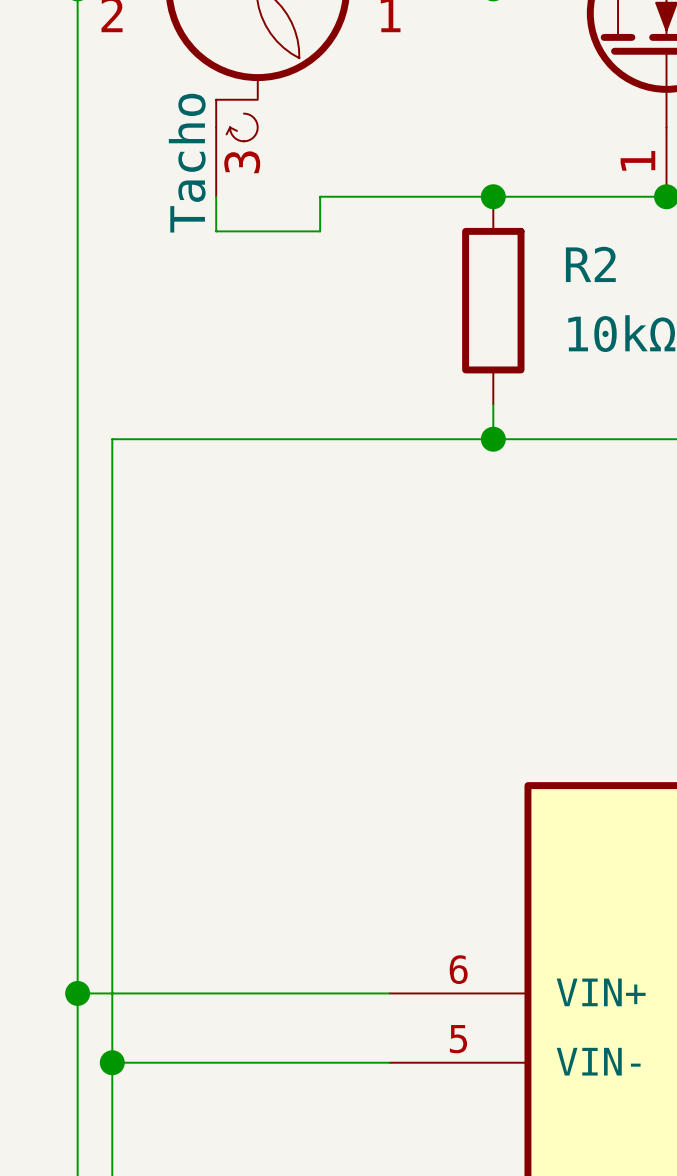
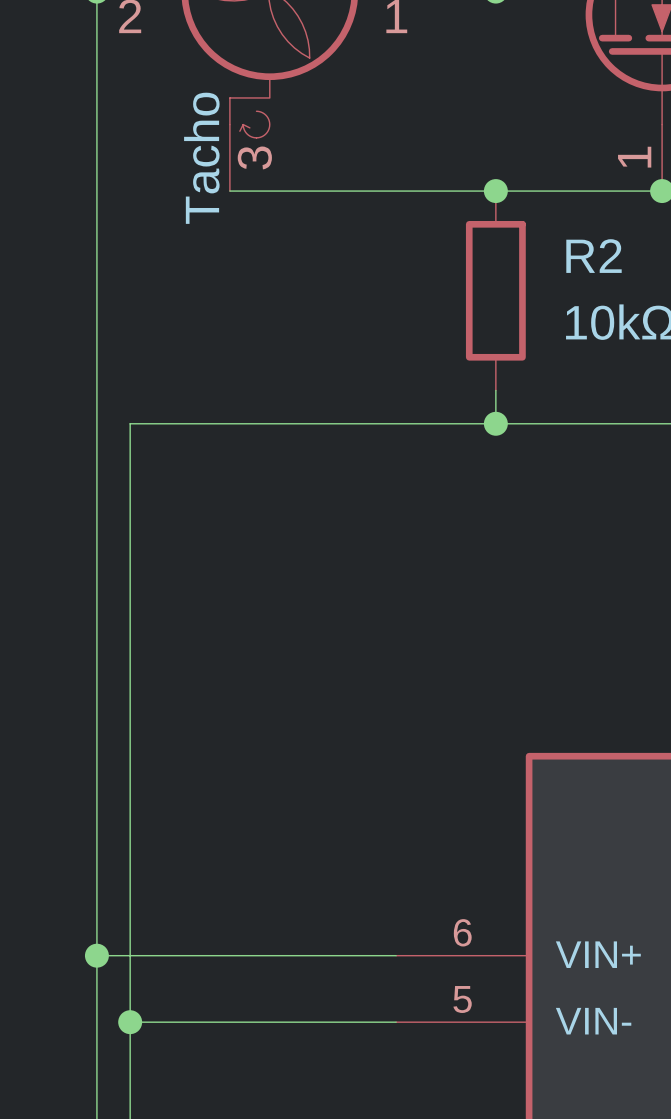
wire: (216, 196) (216, 231) (320, 231) (320, 196) -> (229, 191) (329, 191)

